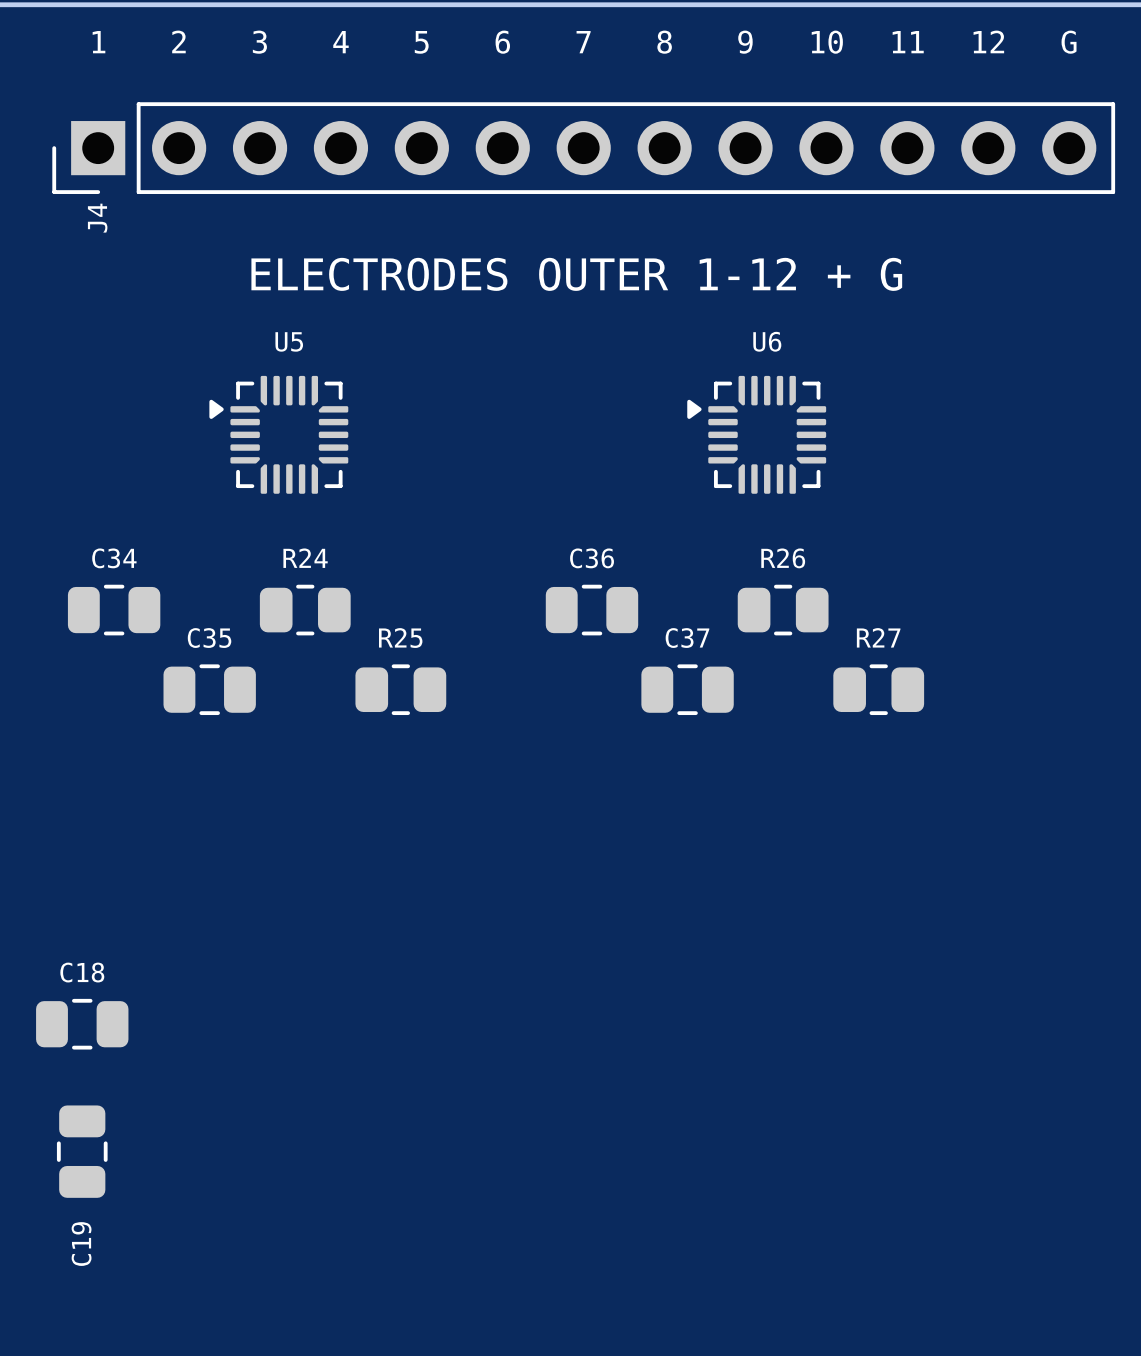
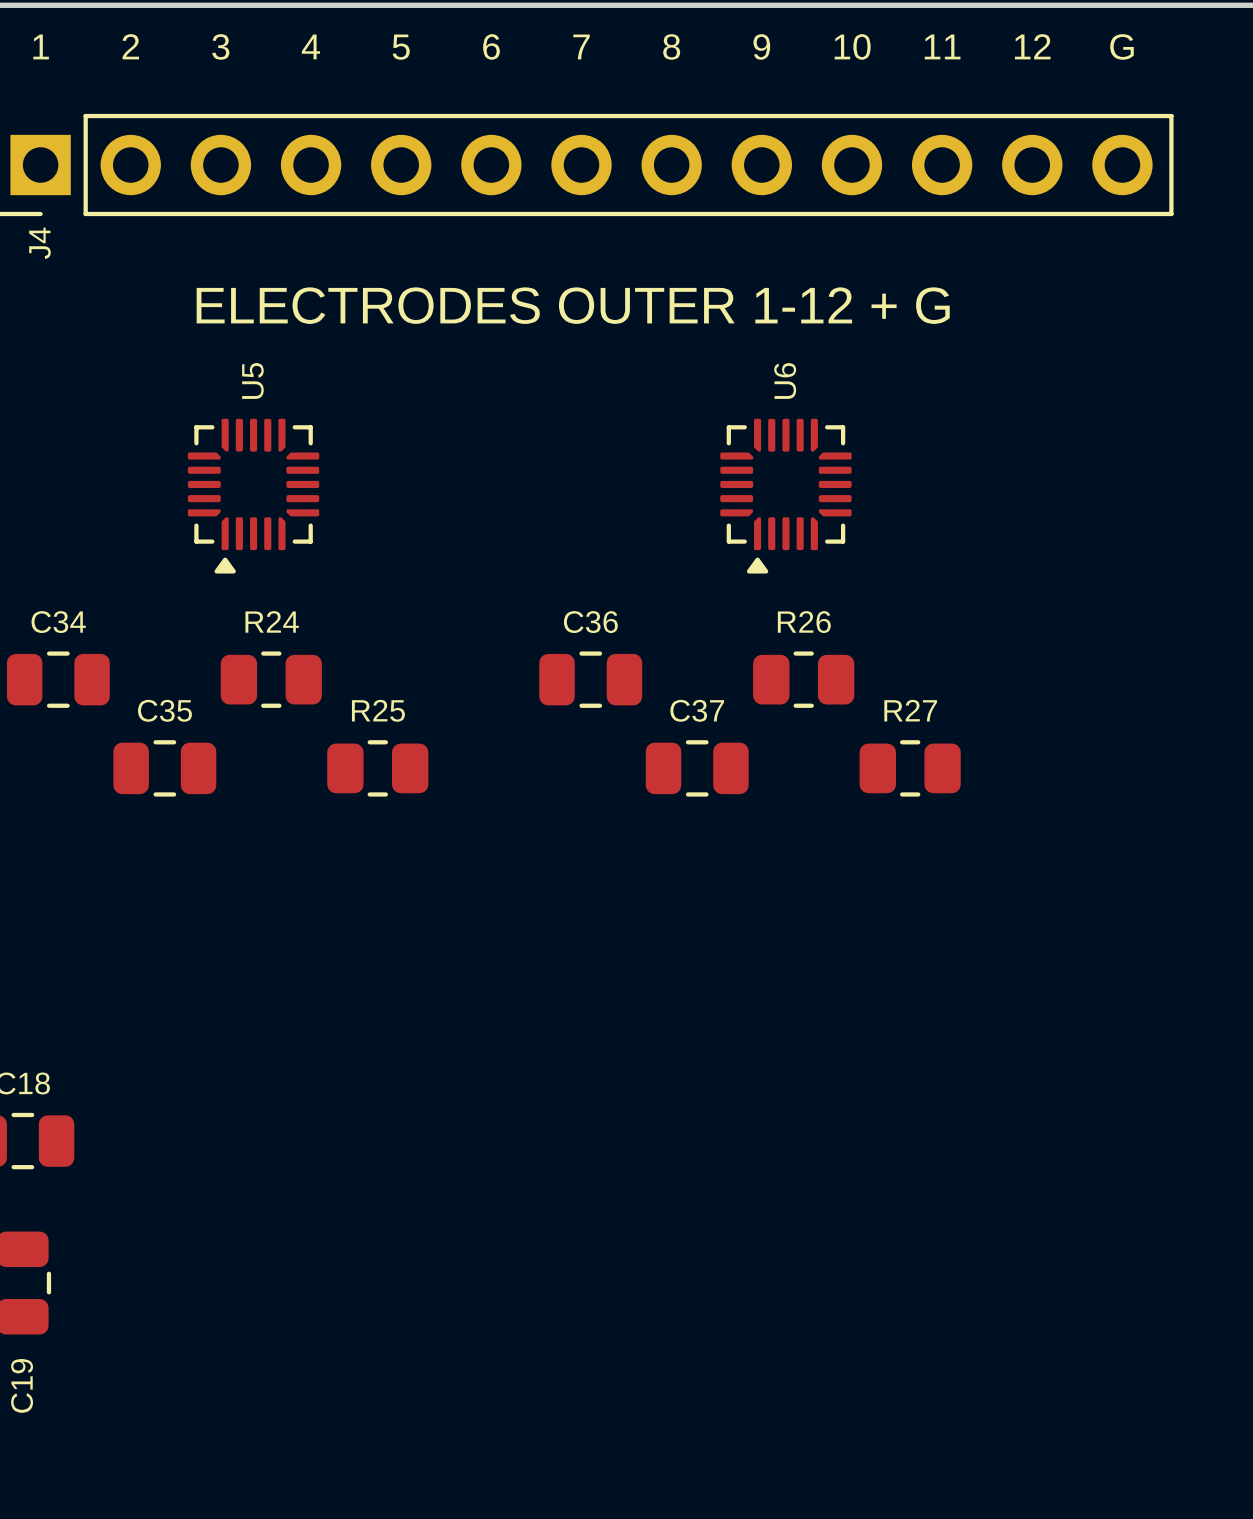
U5 rotation: 0° (278, 434) -> 90° counterclockwise (253, 496)
U6 rotation: 0° (756, 434) -> 90° counterclockwise (785, 496)

